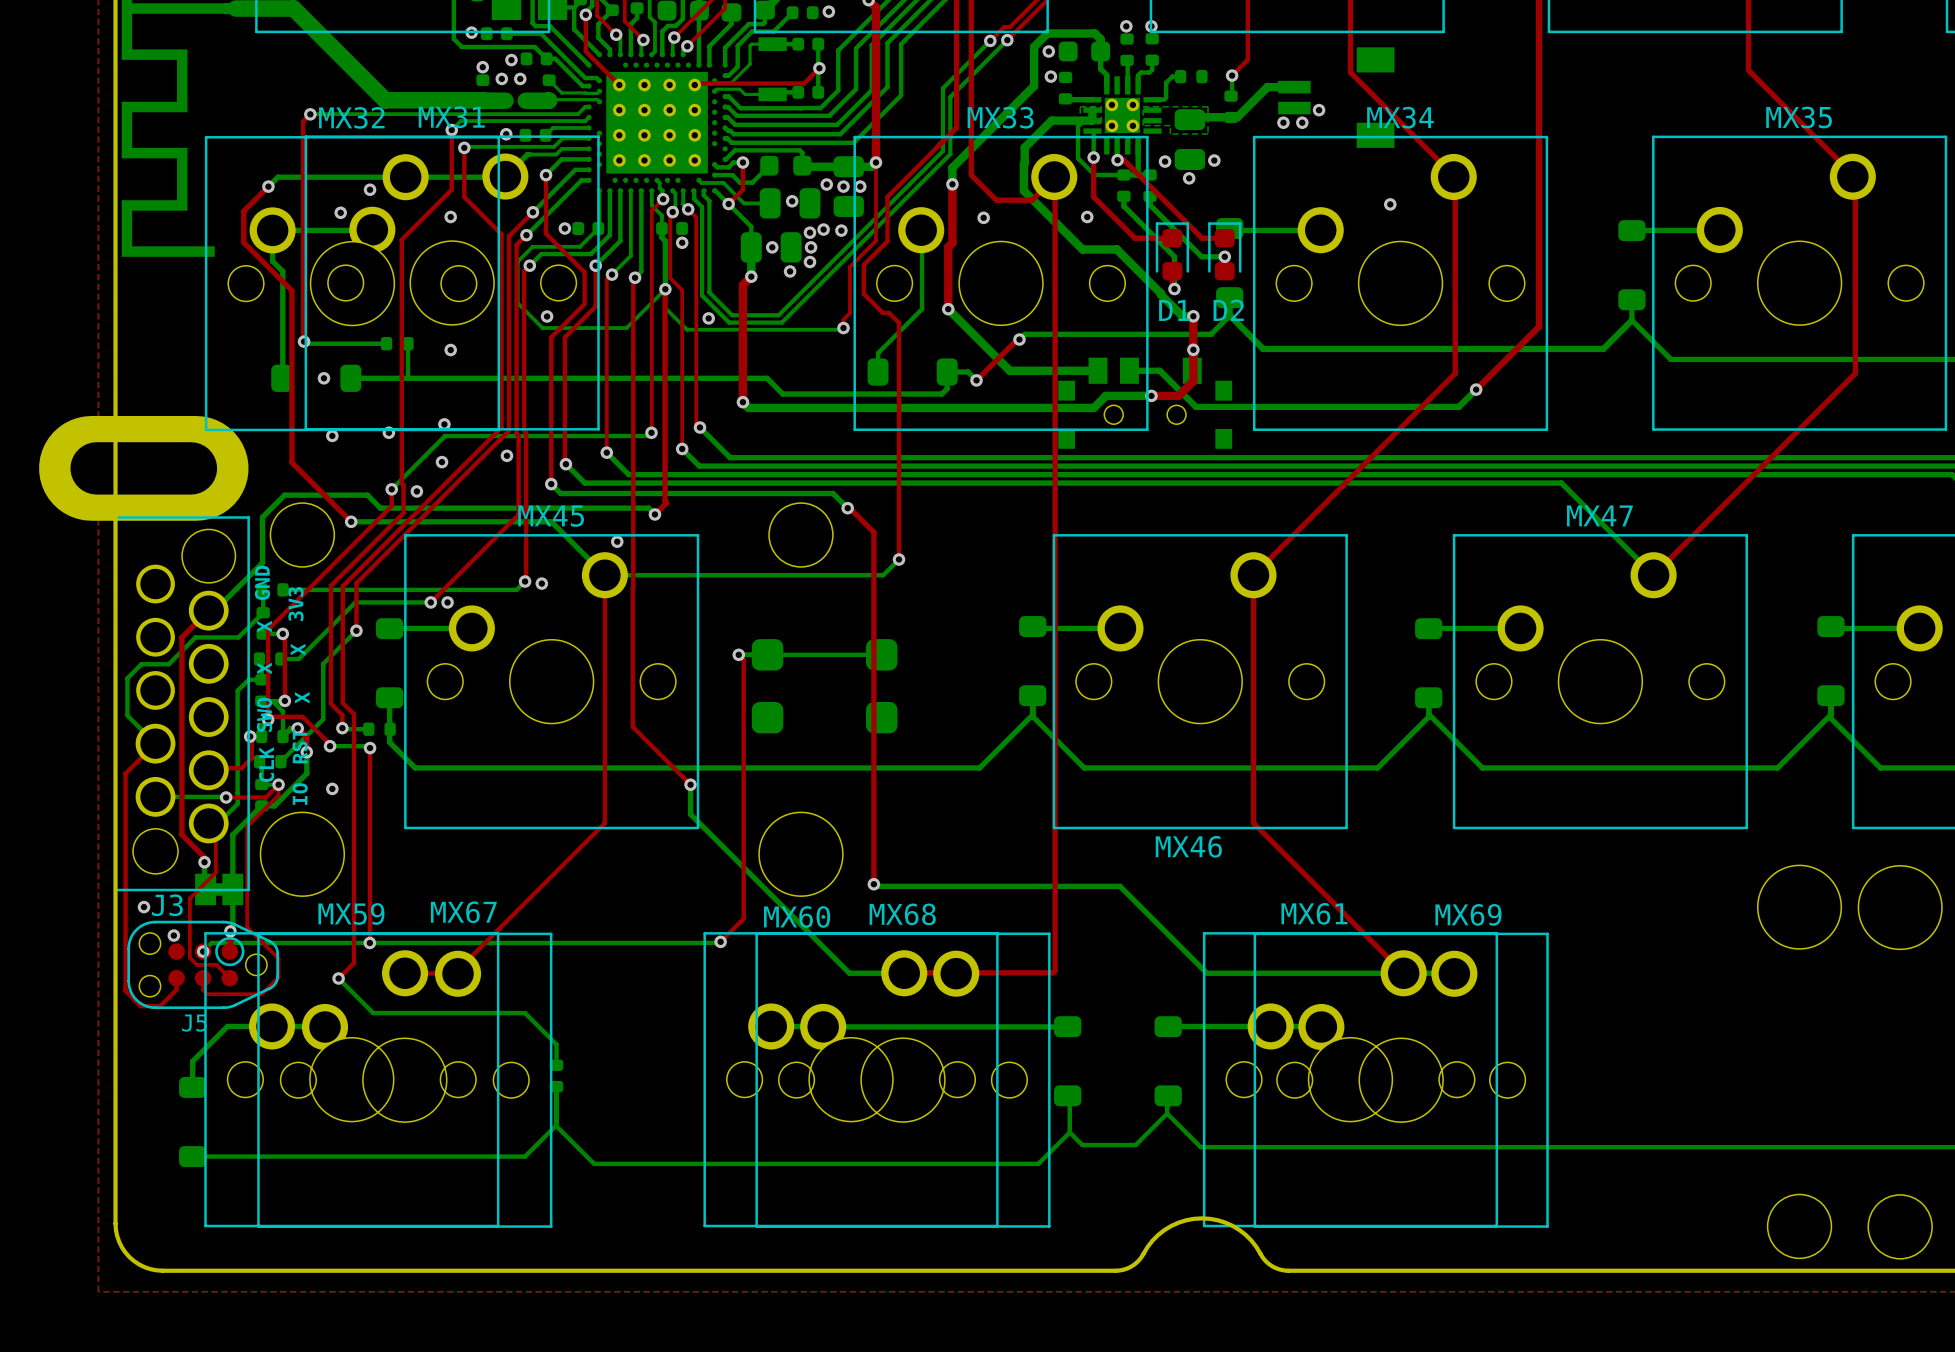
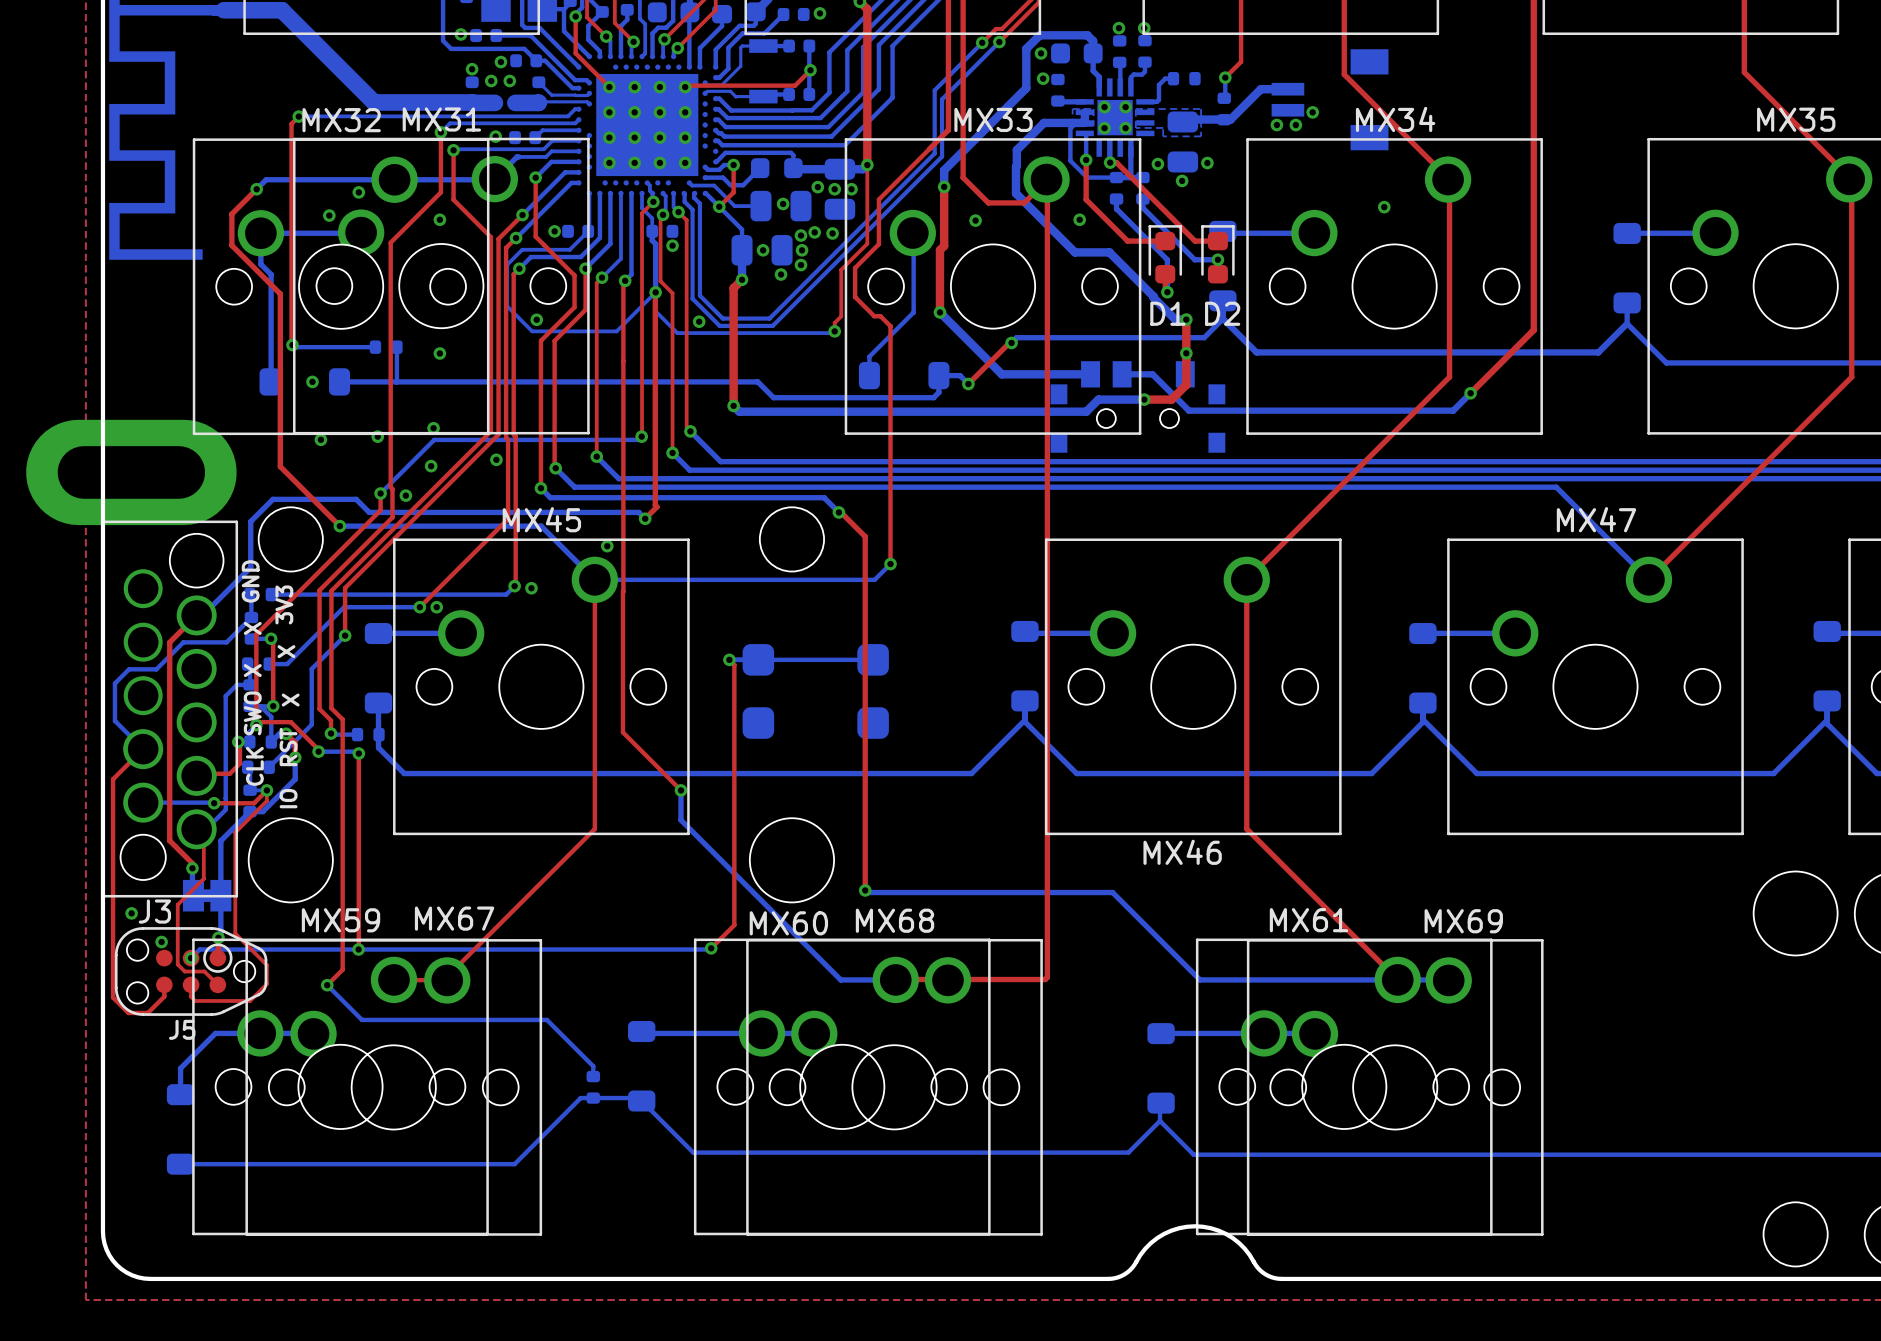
via: (332, 788) -> none
bottom track: (525, 1013) (556, 1044) (556, 1065) -> (514, 1019) (546, 1019) (593, 1066) (593, 1076)
bottom track: none -> (641, 1031) (643, 1033) (762, 1033)
bottom track: (823, 1026) (1067, 1026) -> none
part position: (1067, 1061) -> (641, 1066)
part position: (556, 1075) -> (593, 1087)
bottom track: (556, 1086) (556, 1126) (594, 1163) (1038, 1163) (1069, 1132) -> none
bottom track: (1069, 1097) (1069, 1132) -> none
bottom track: (1069, 1132) (1082, 1145) -> (546, 1132) (580, 1098) (638, 1098) (693, 1152) (1074, 1152)

